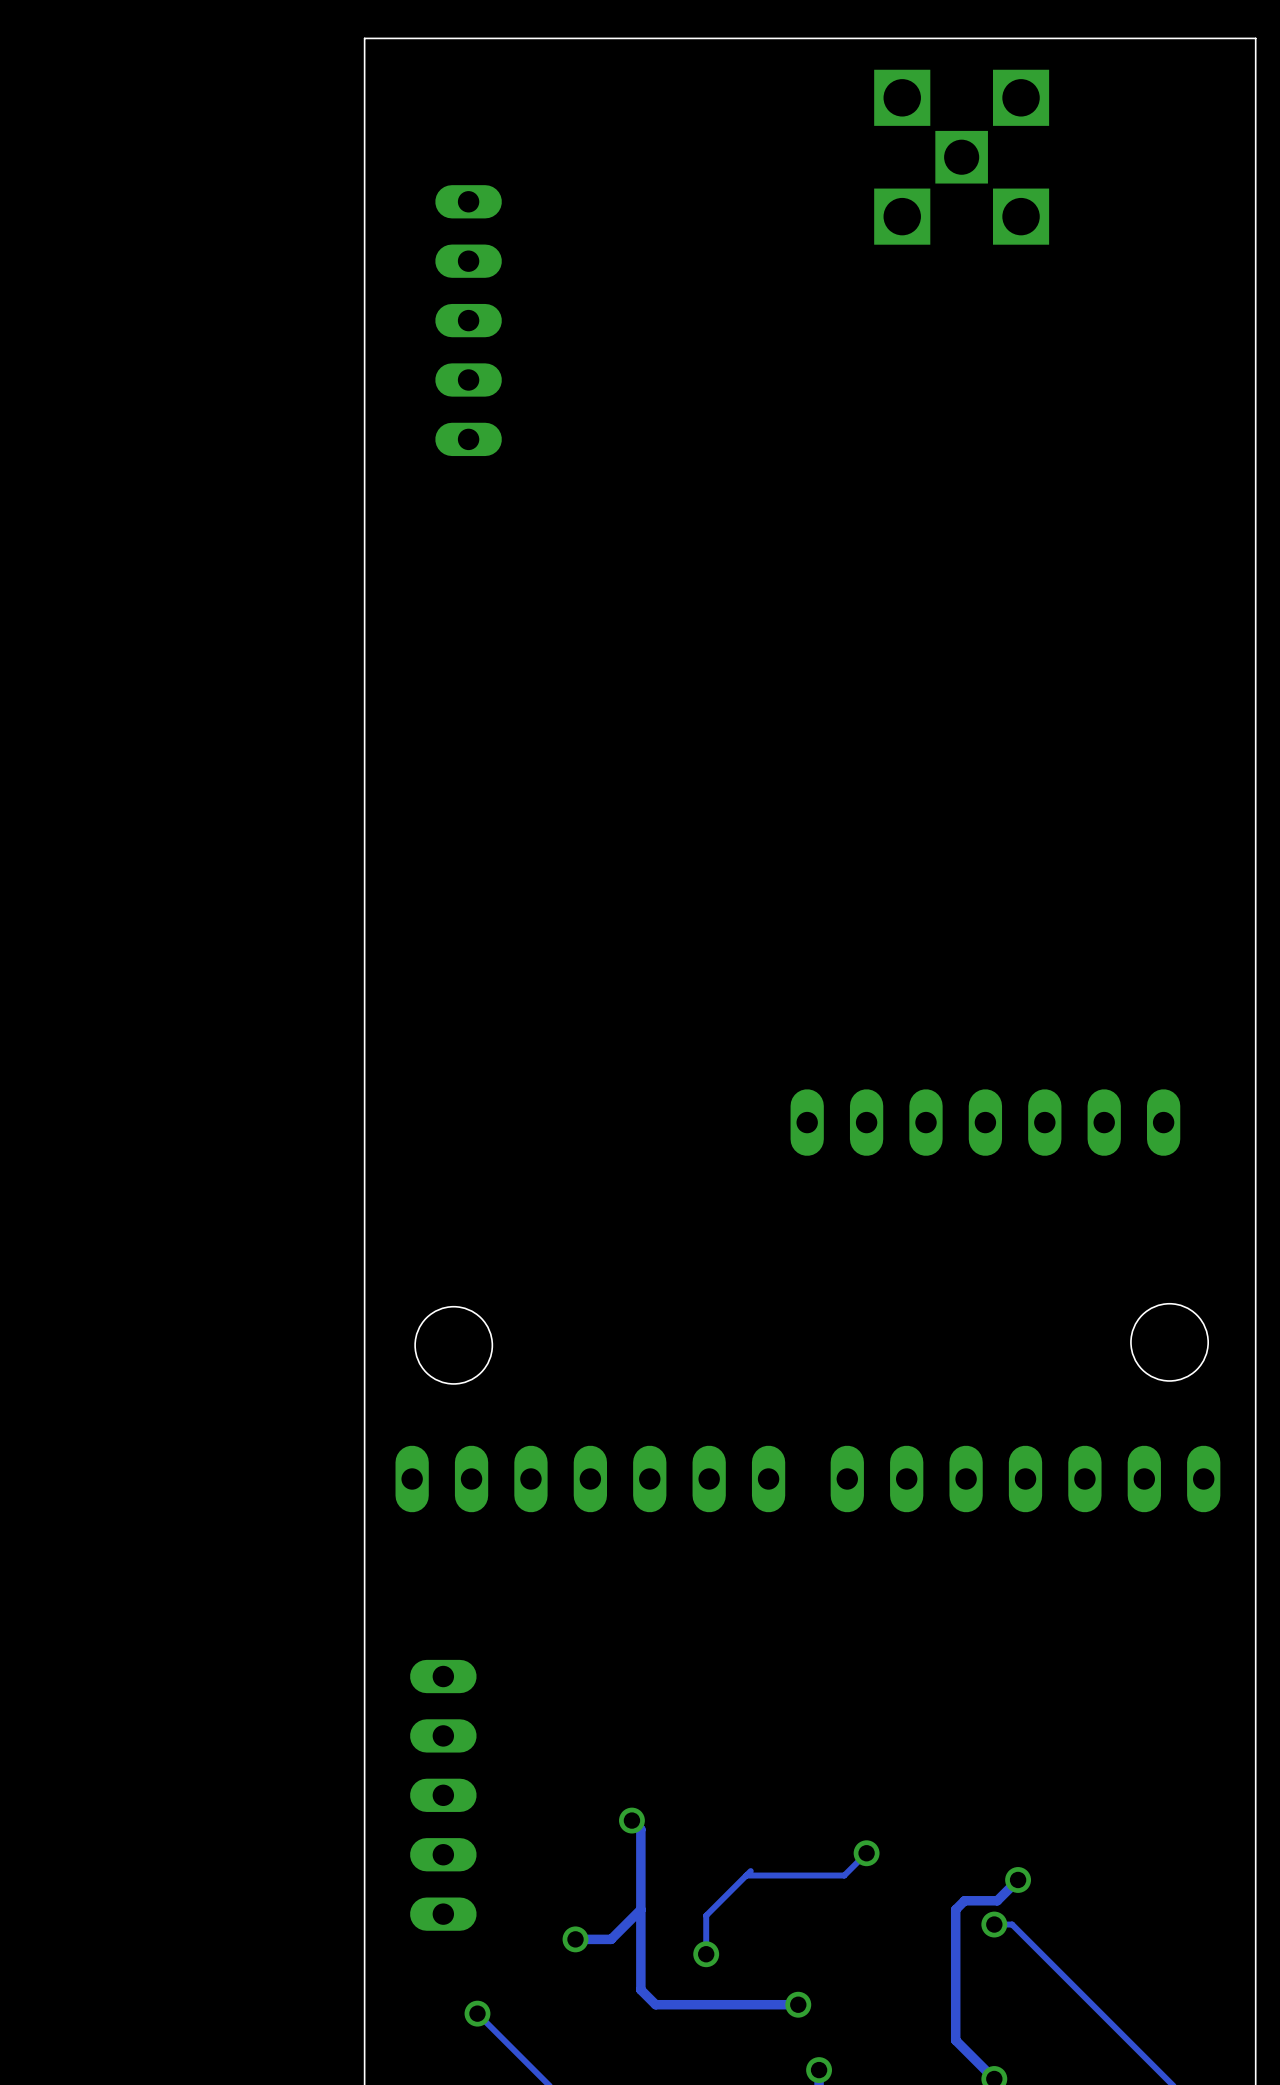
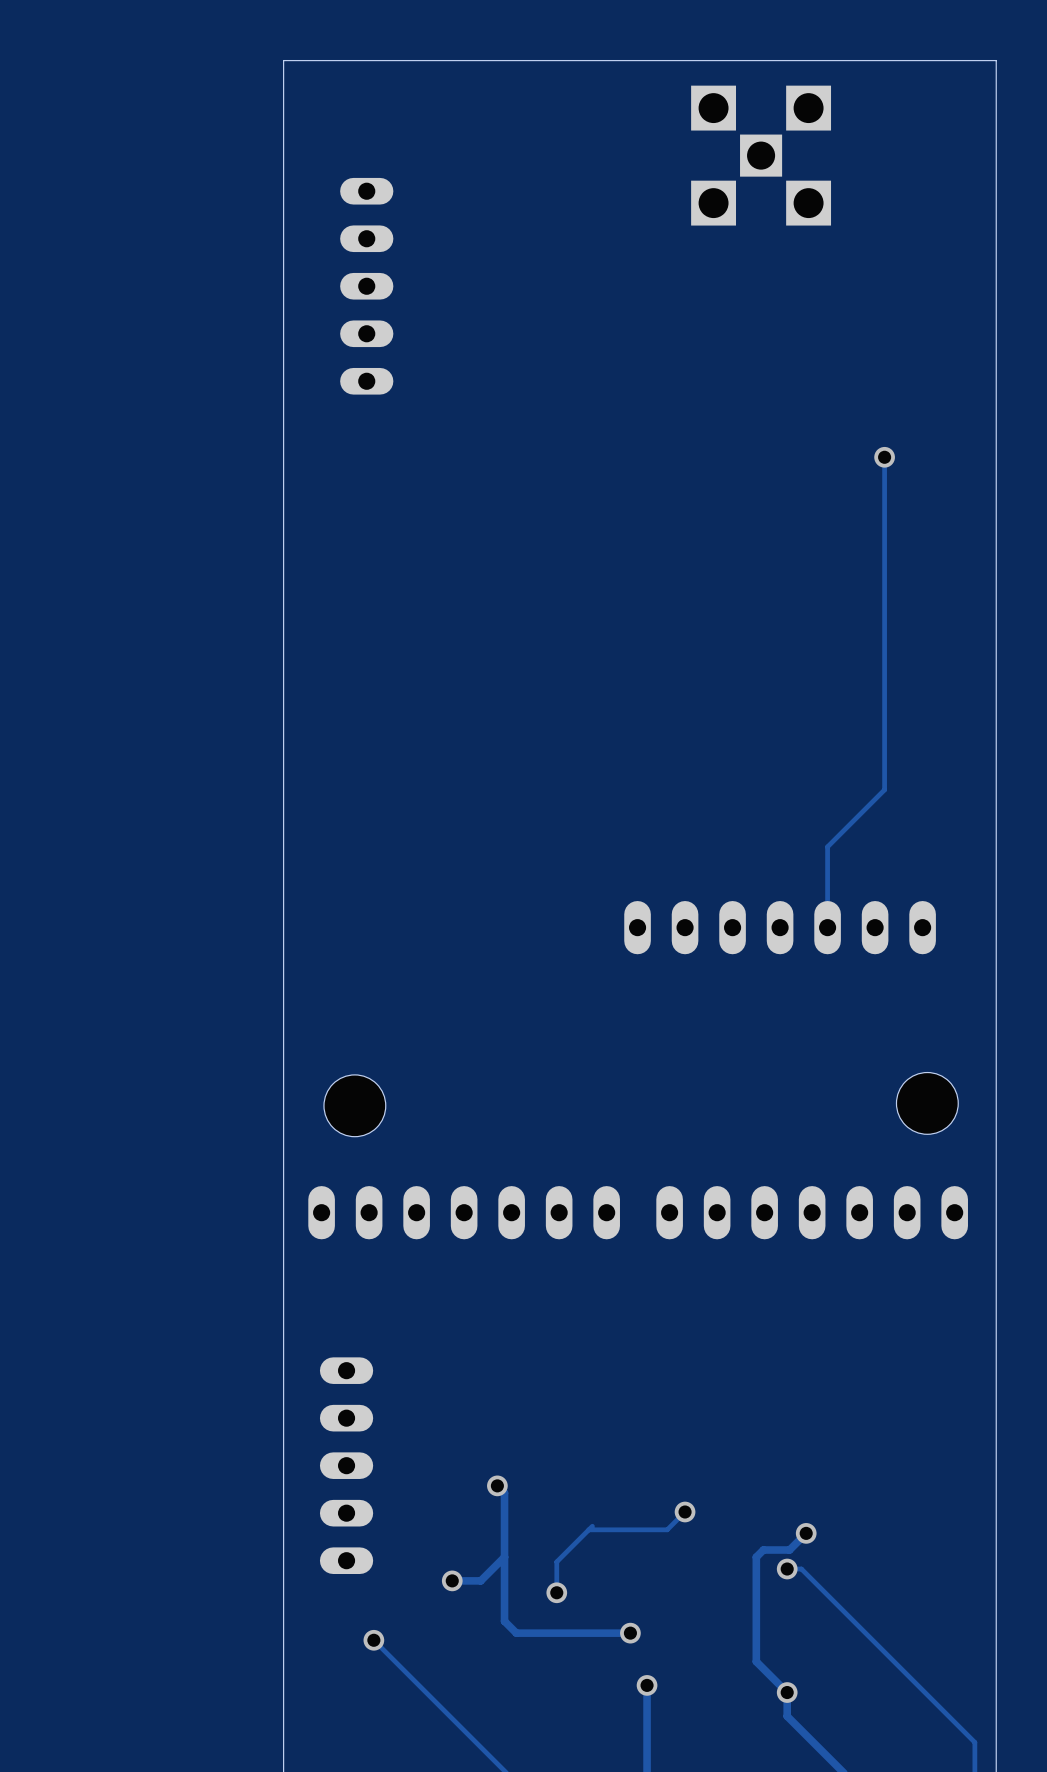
track: none -> (884, 457) (884, 789) (827, 846) (827, 925) (825, 927)
via: none -> (884, 457)

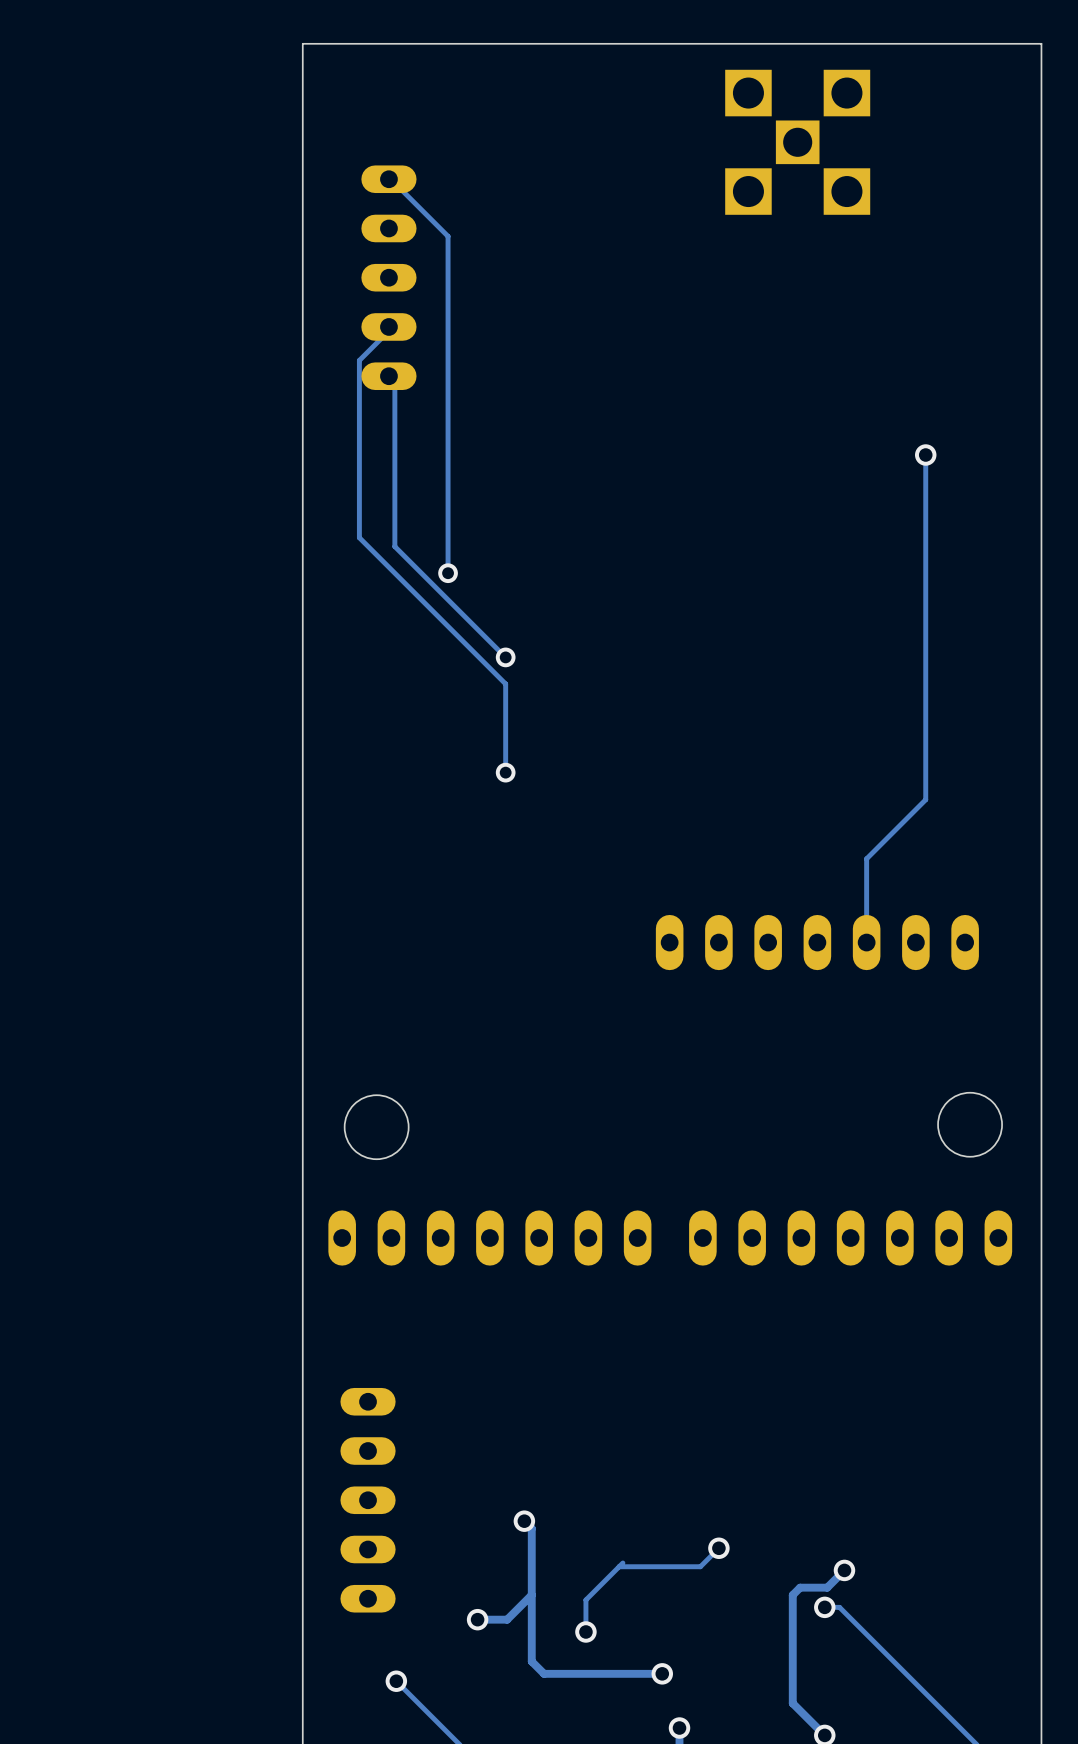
track: none -> (393, 179) (394, 183) (448, 236) (448, 573)
track: none -> (393, 326) (359, 360) (359, 537) (505, 684) (505, 772)
track: none -> (393, 376) (394, 546) (505, 657)
via: none -> (448, 573)
via: none -> (505, 657)
via: none -> (505, 772)

